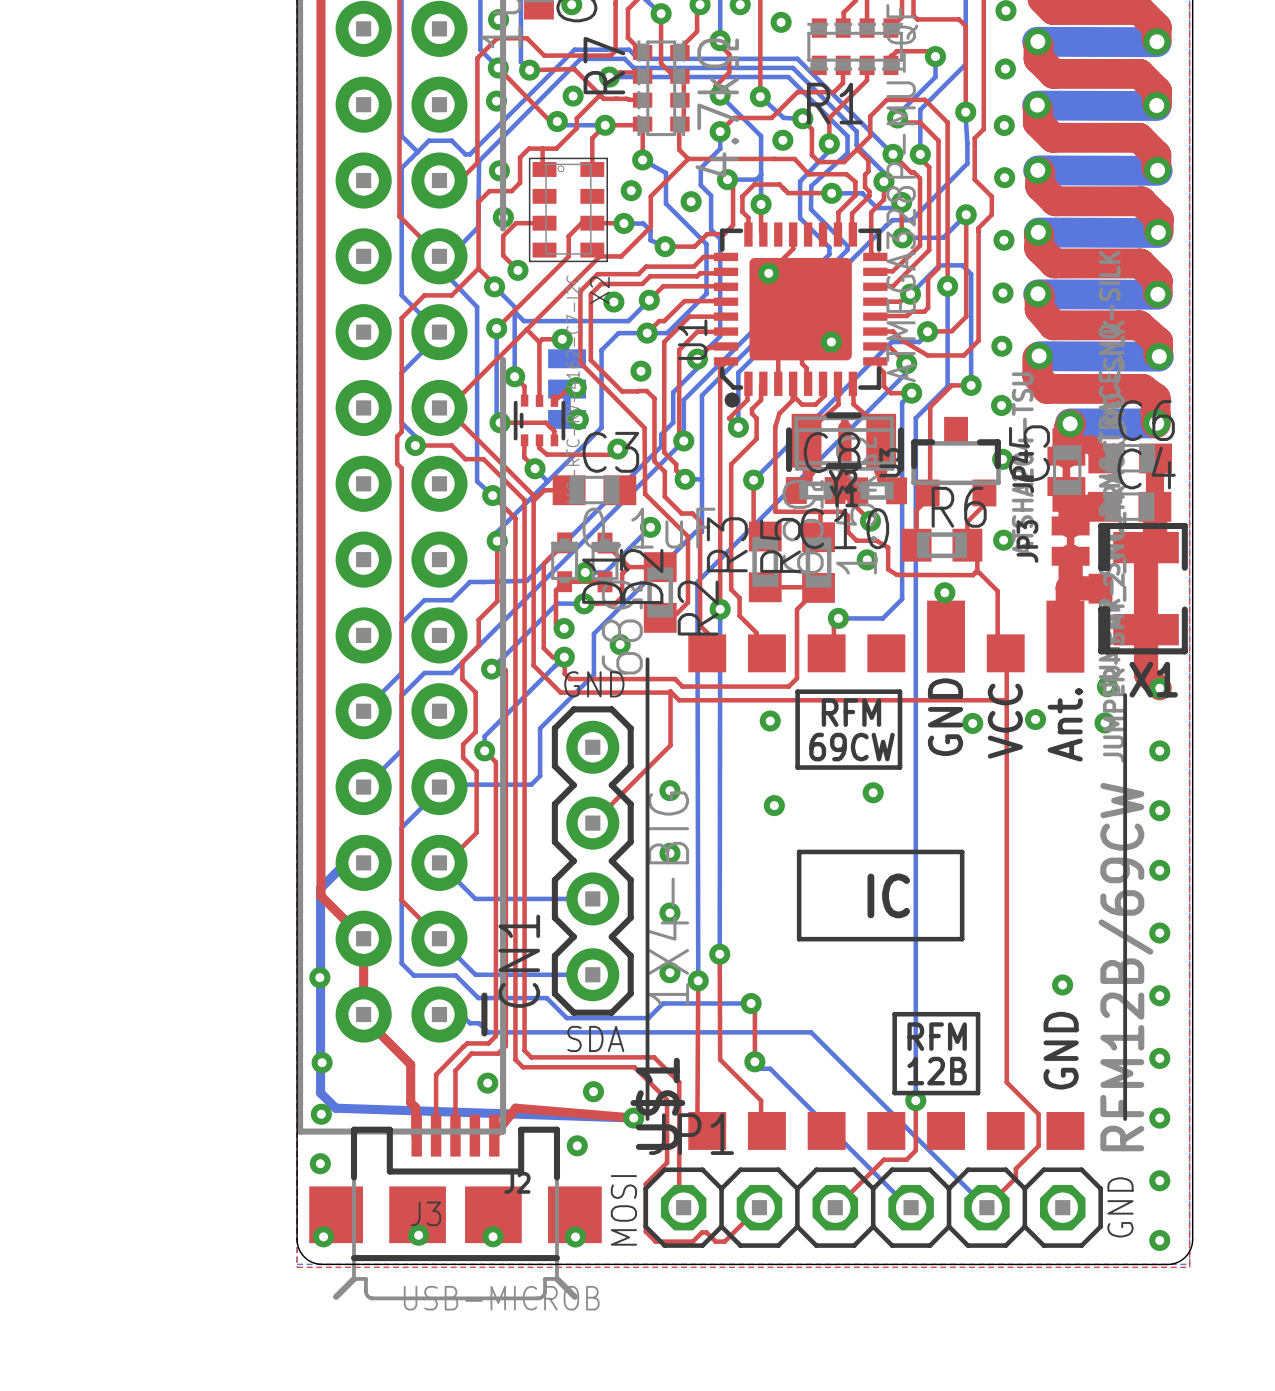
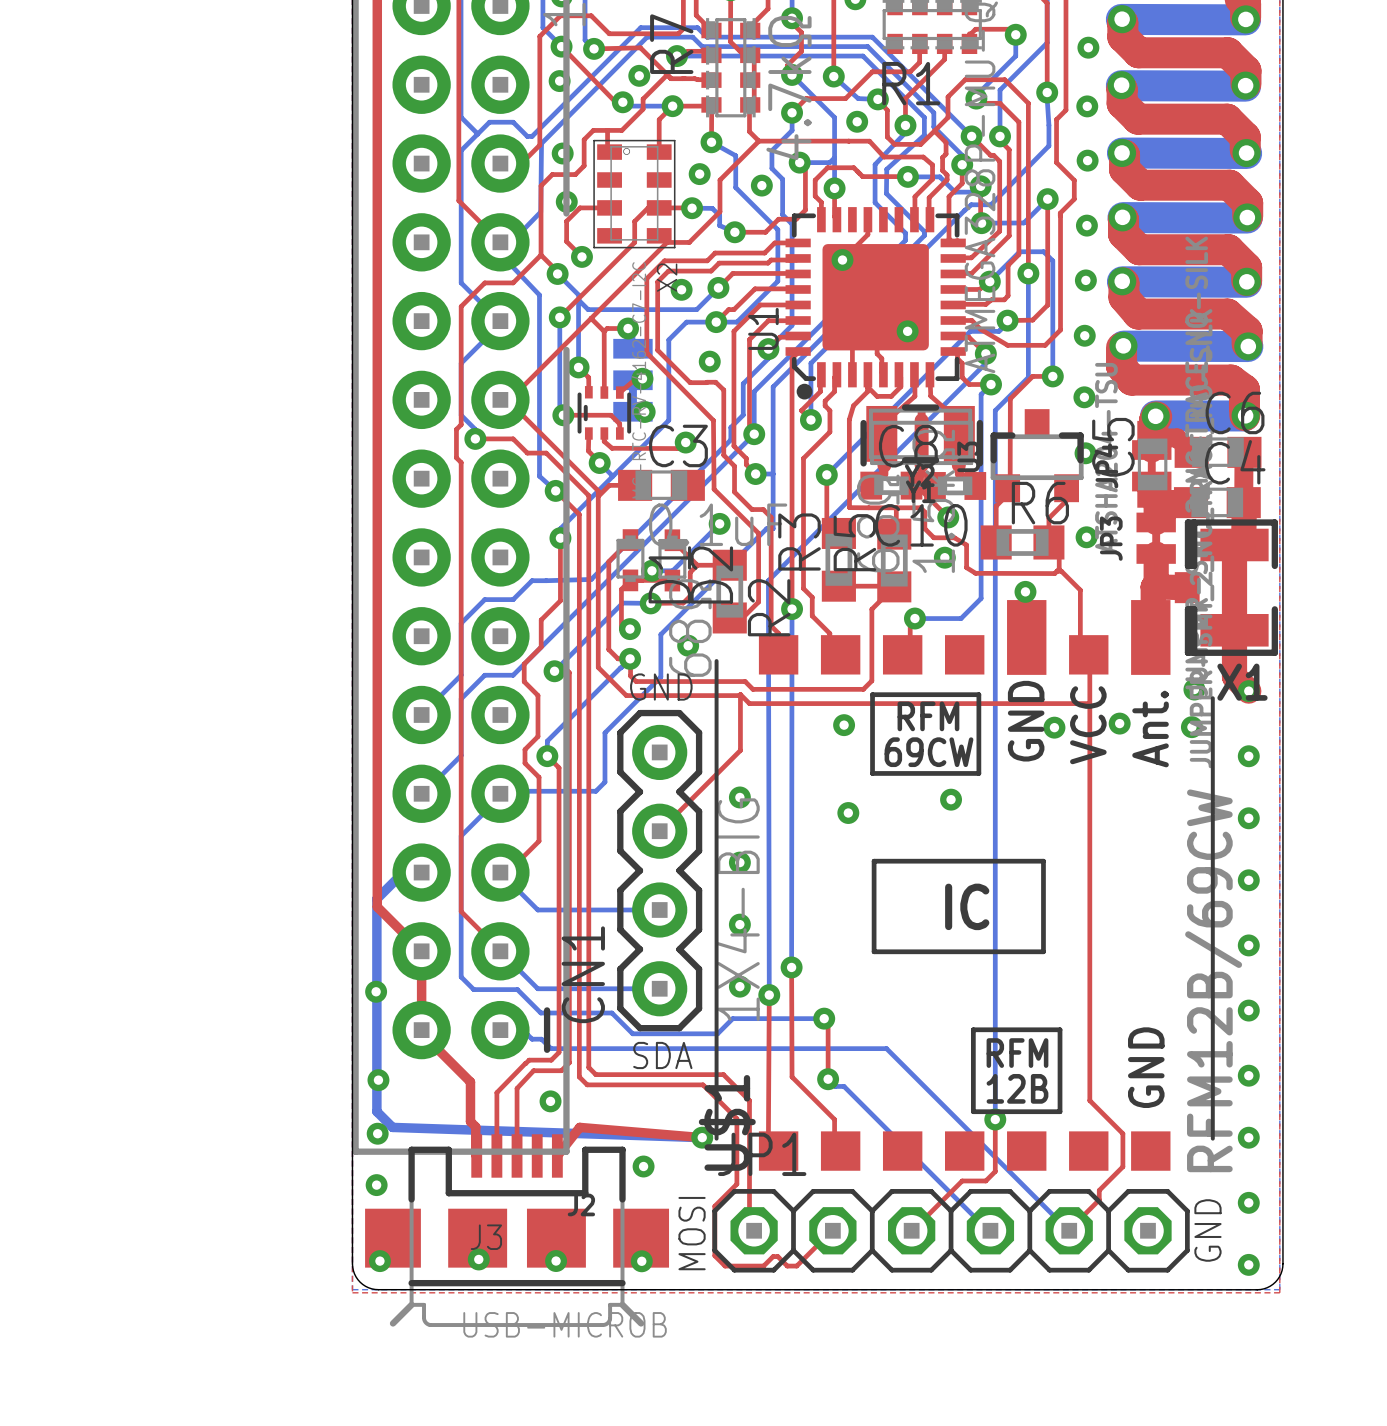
via: (1062, 984) -> none
via: (593, 1091) -> none

